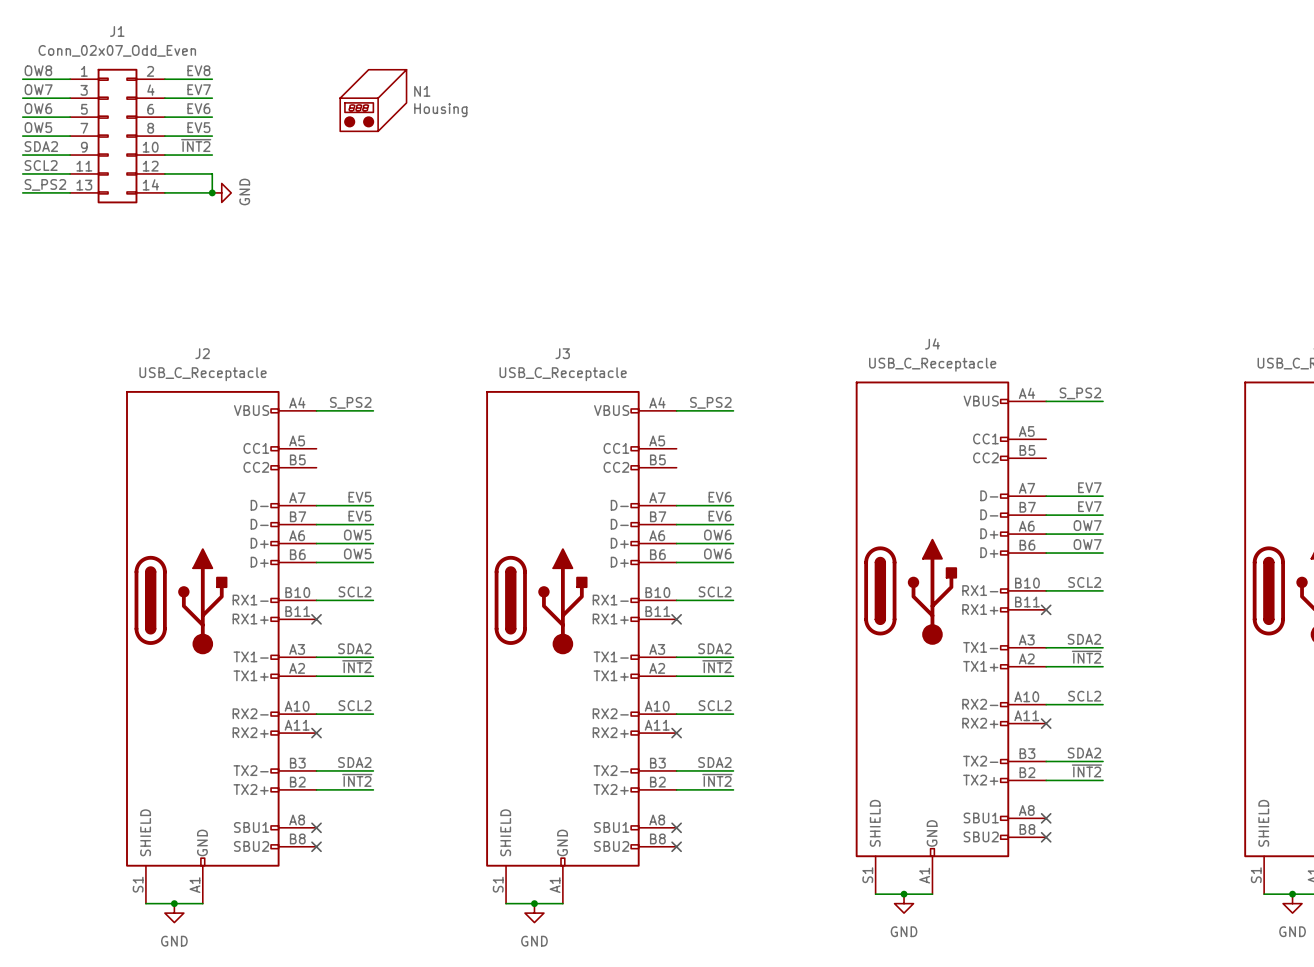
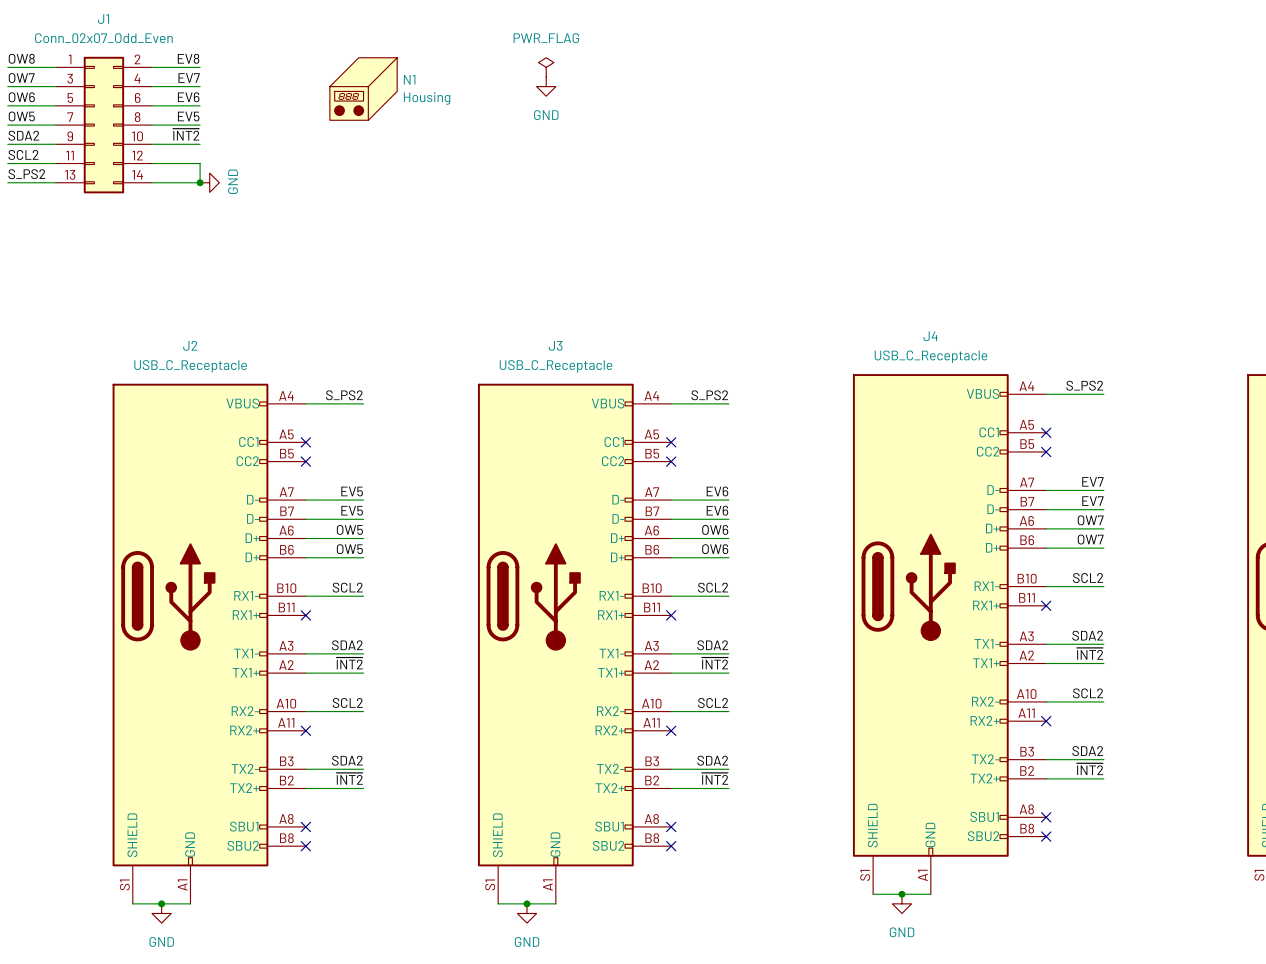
power symbol: none -> PWR_FLAG (546, 67)
power symbol: none -> GND (546, 86)
no-connect mark: none -> (1046, 432)
no-connect mark: none -> (305, 442)
no-connect mark: none -> (671, 442)
no-connect mark: none -> (1046, 451)
no-connect mark: none -> (305, 461)
no-connect mark: none -> (671, 461)

